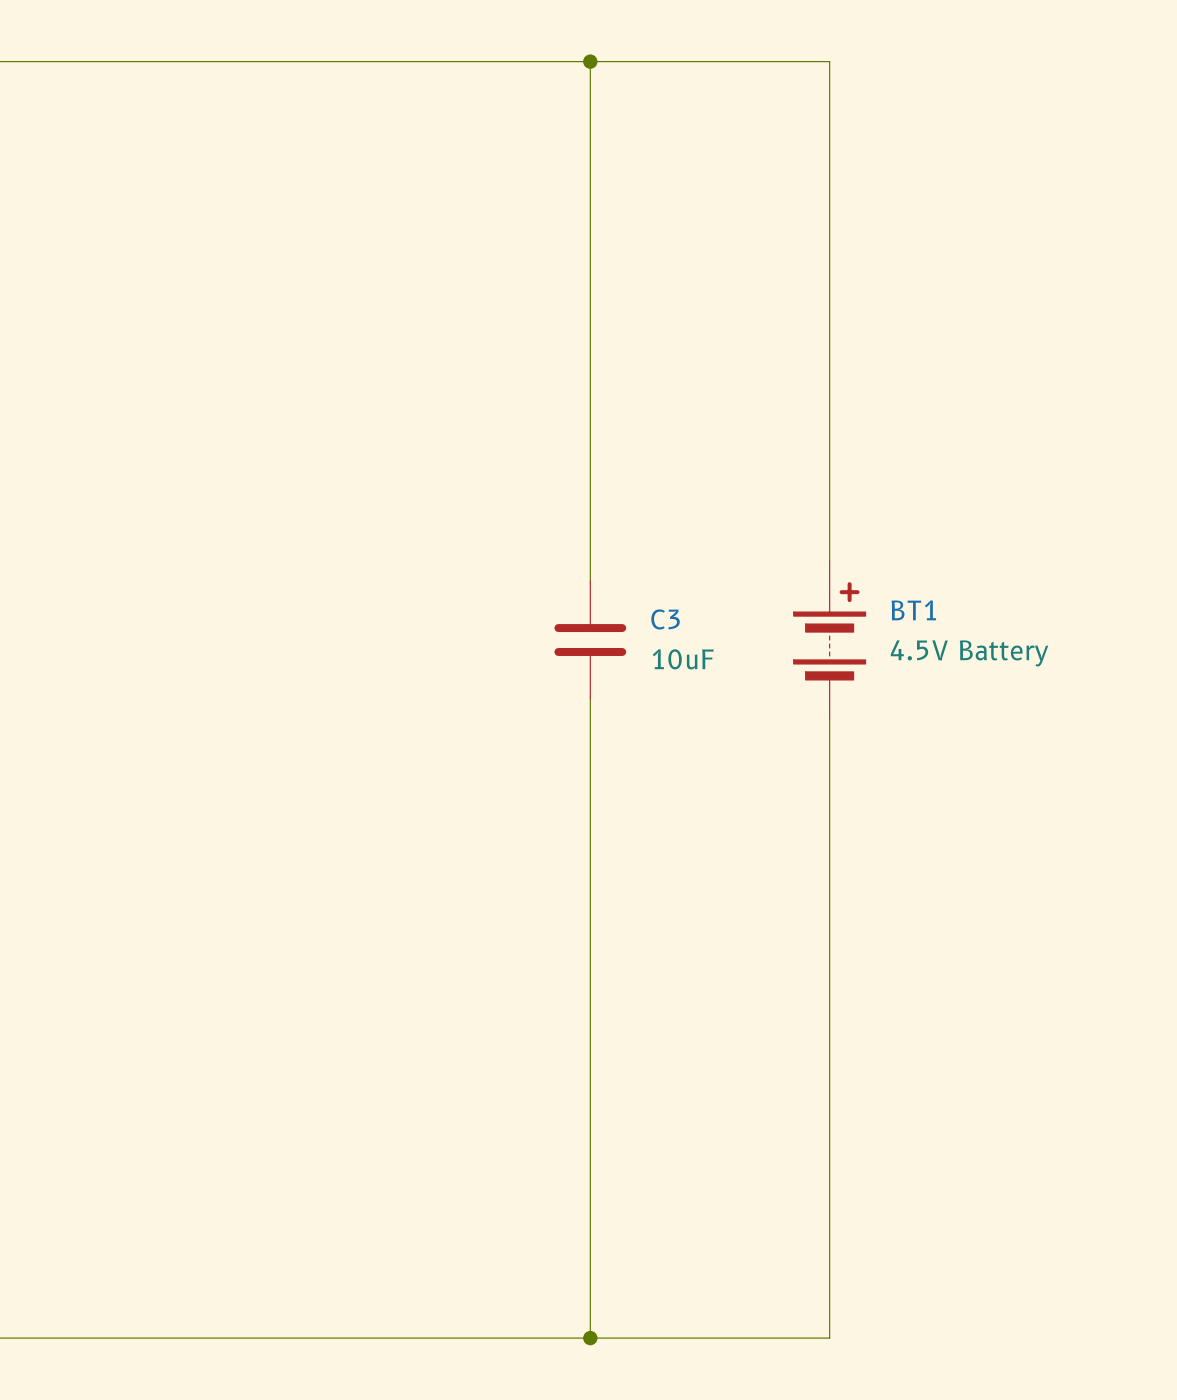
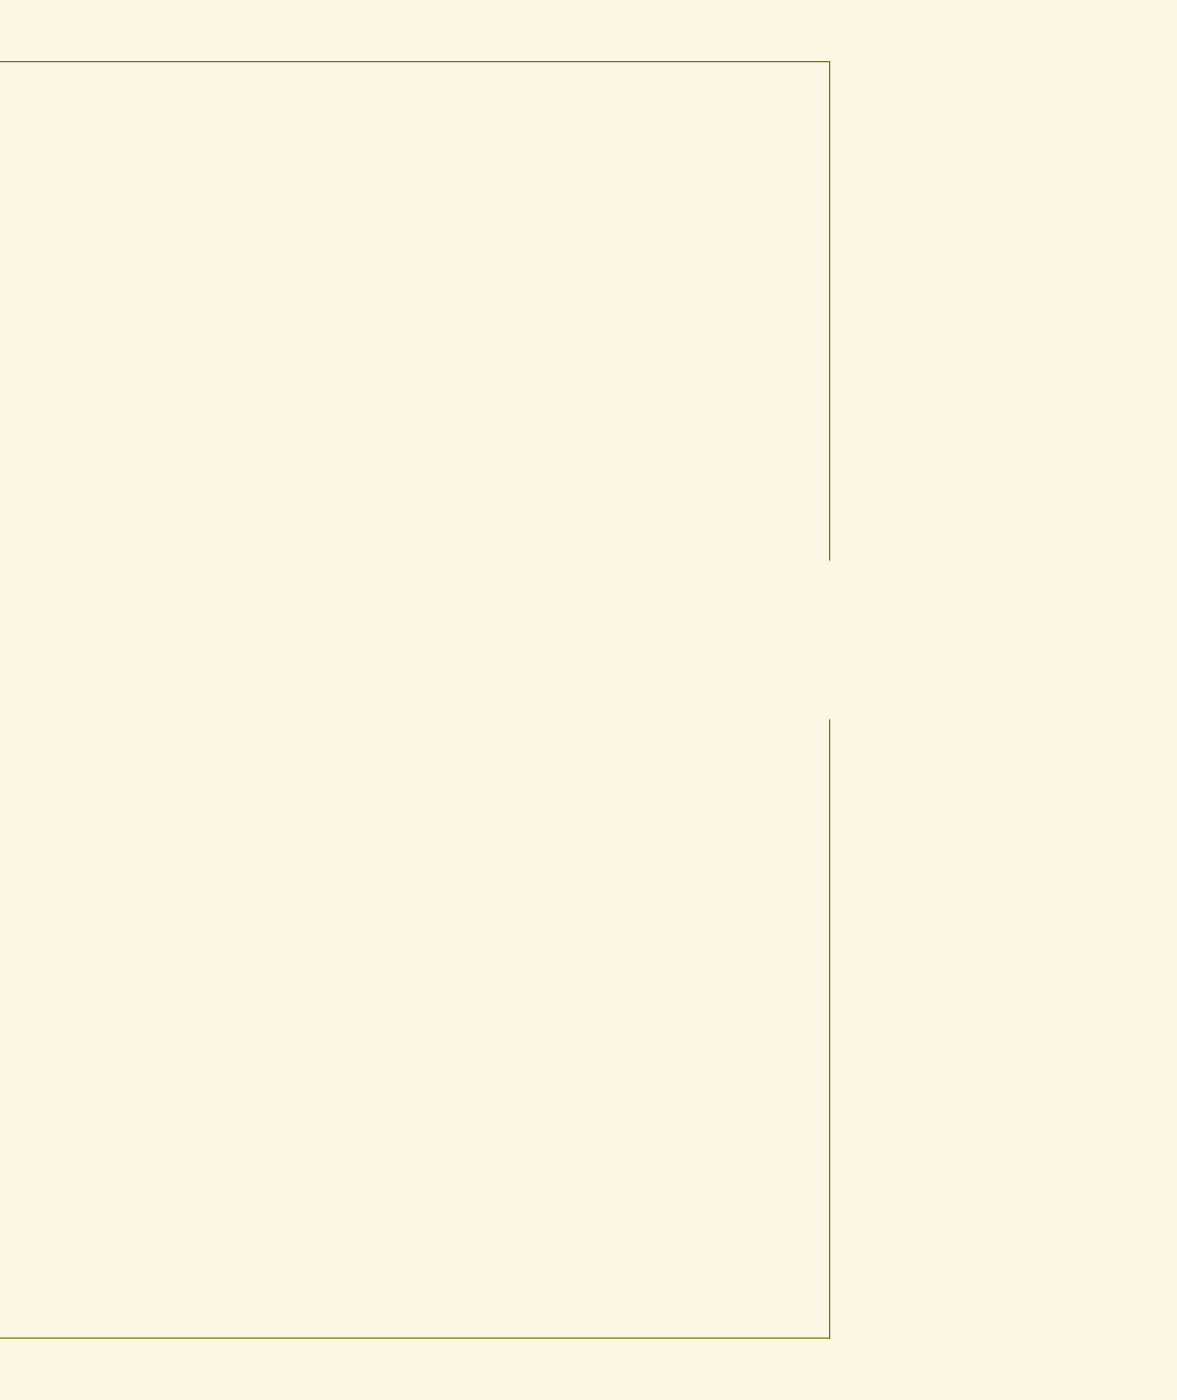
wire: (590, 61) (590, 580) -> none
junction: (590, 61) -> none
C3: 10uF (590, 640) -> none
BT1: 4.5V Battery (829, 640) -> none
wire: (590, 699) (590, 1338) -> none
junction: (590, 1338) -> none

